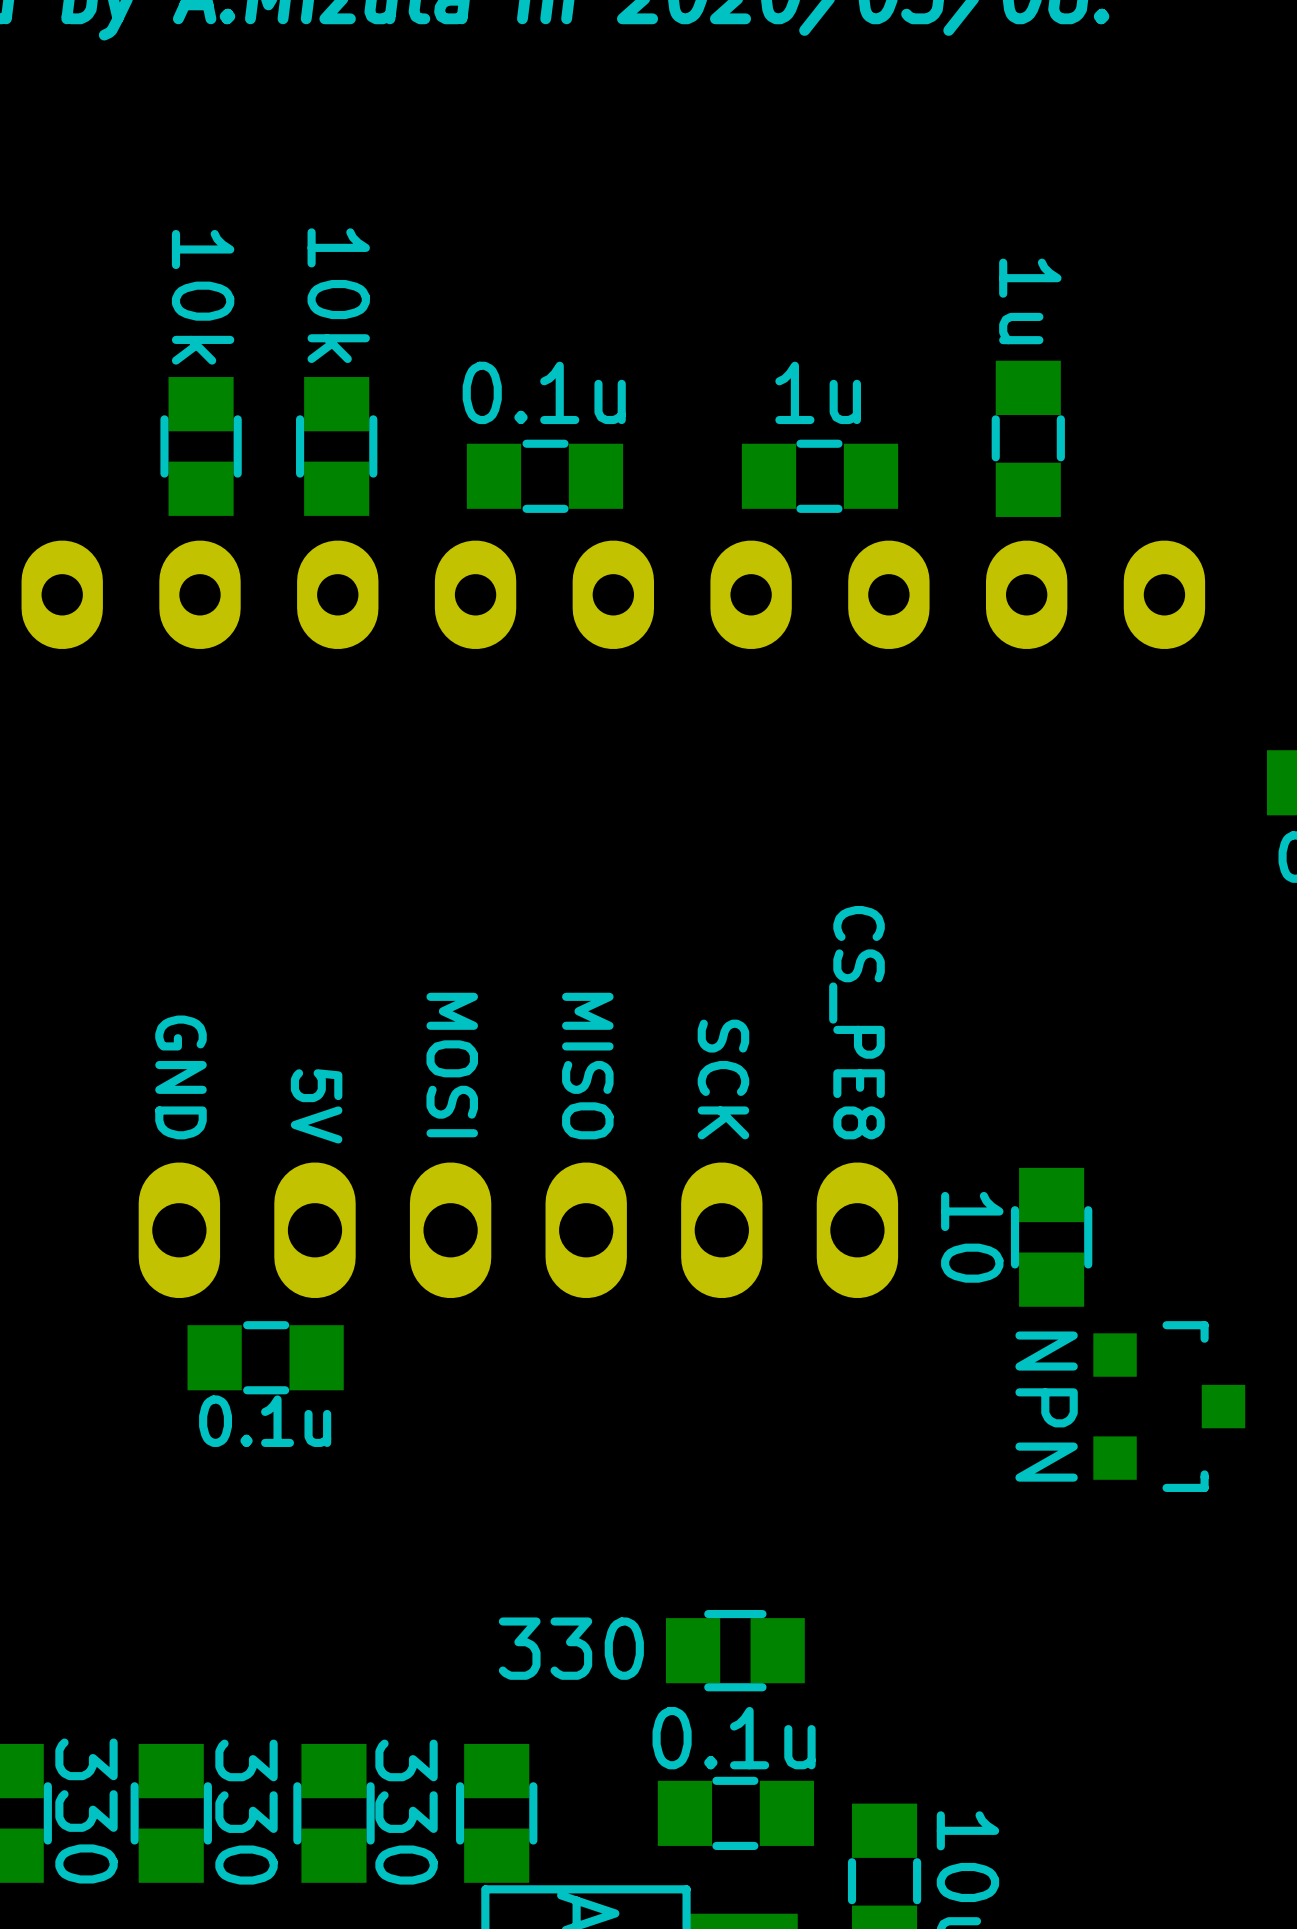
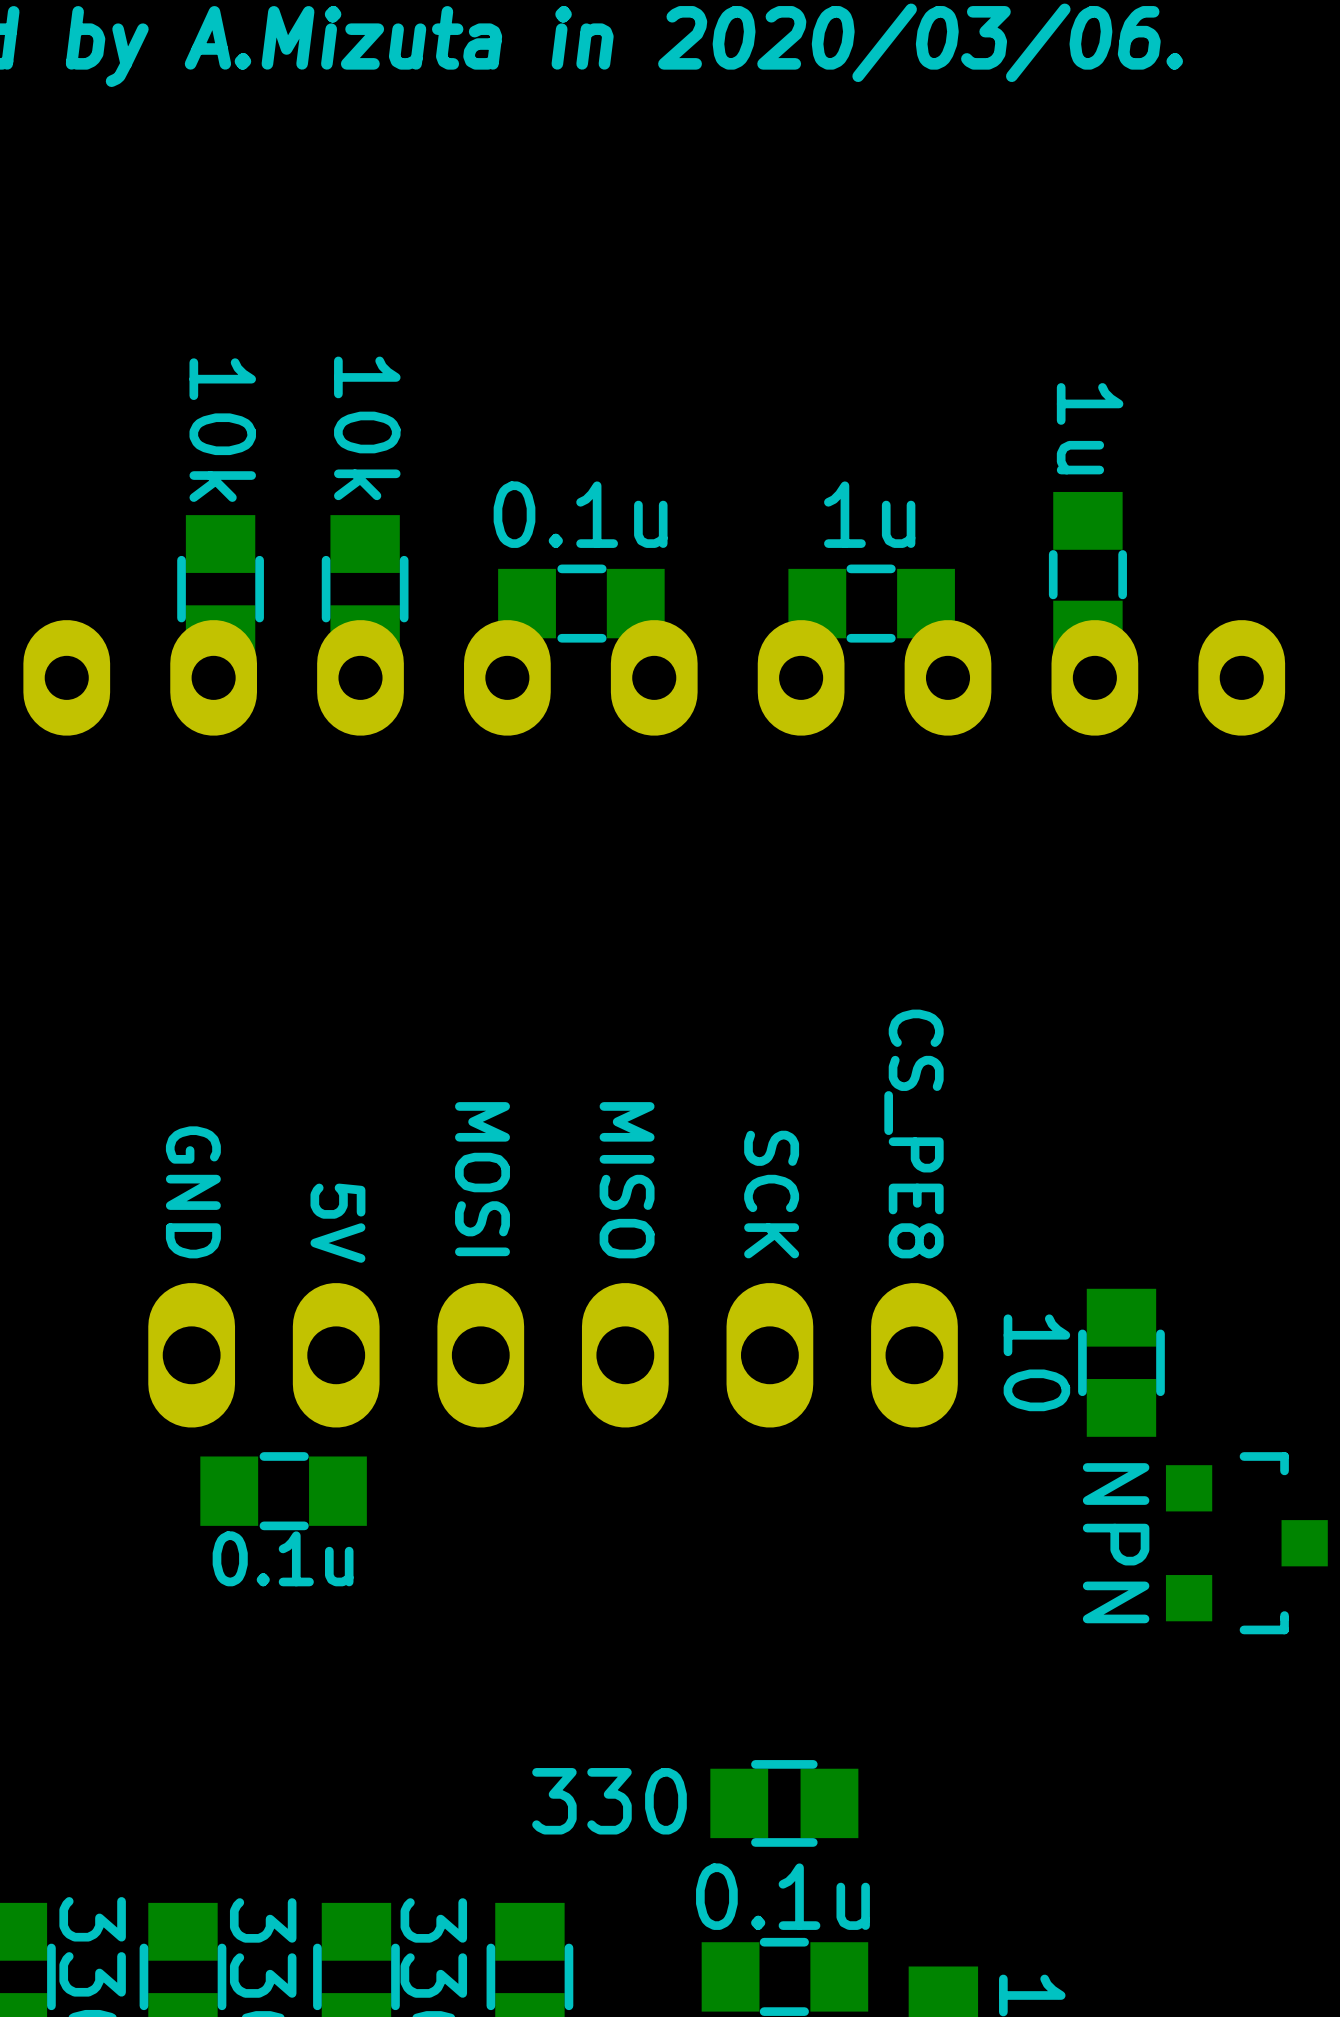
part position: (1028, 438) -> (1087, 575)
part position: (201, 446) -> (220, 589)
part position: (336, 446) -> (365, 589)
part position: (544, 476) -> (581, 603)
part position: (820, 476) -> (871, 603)

